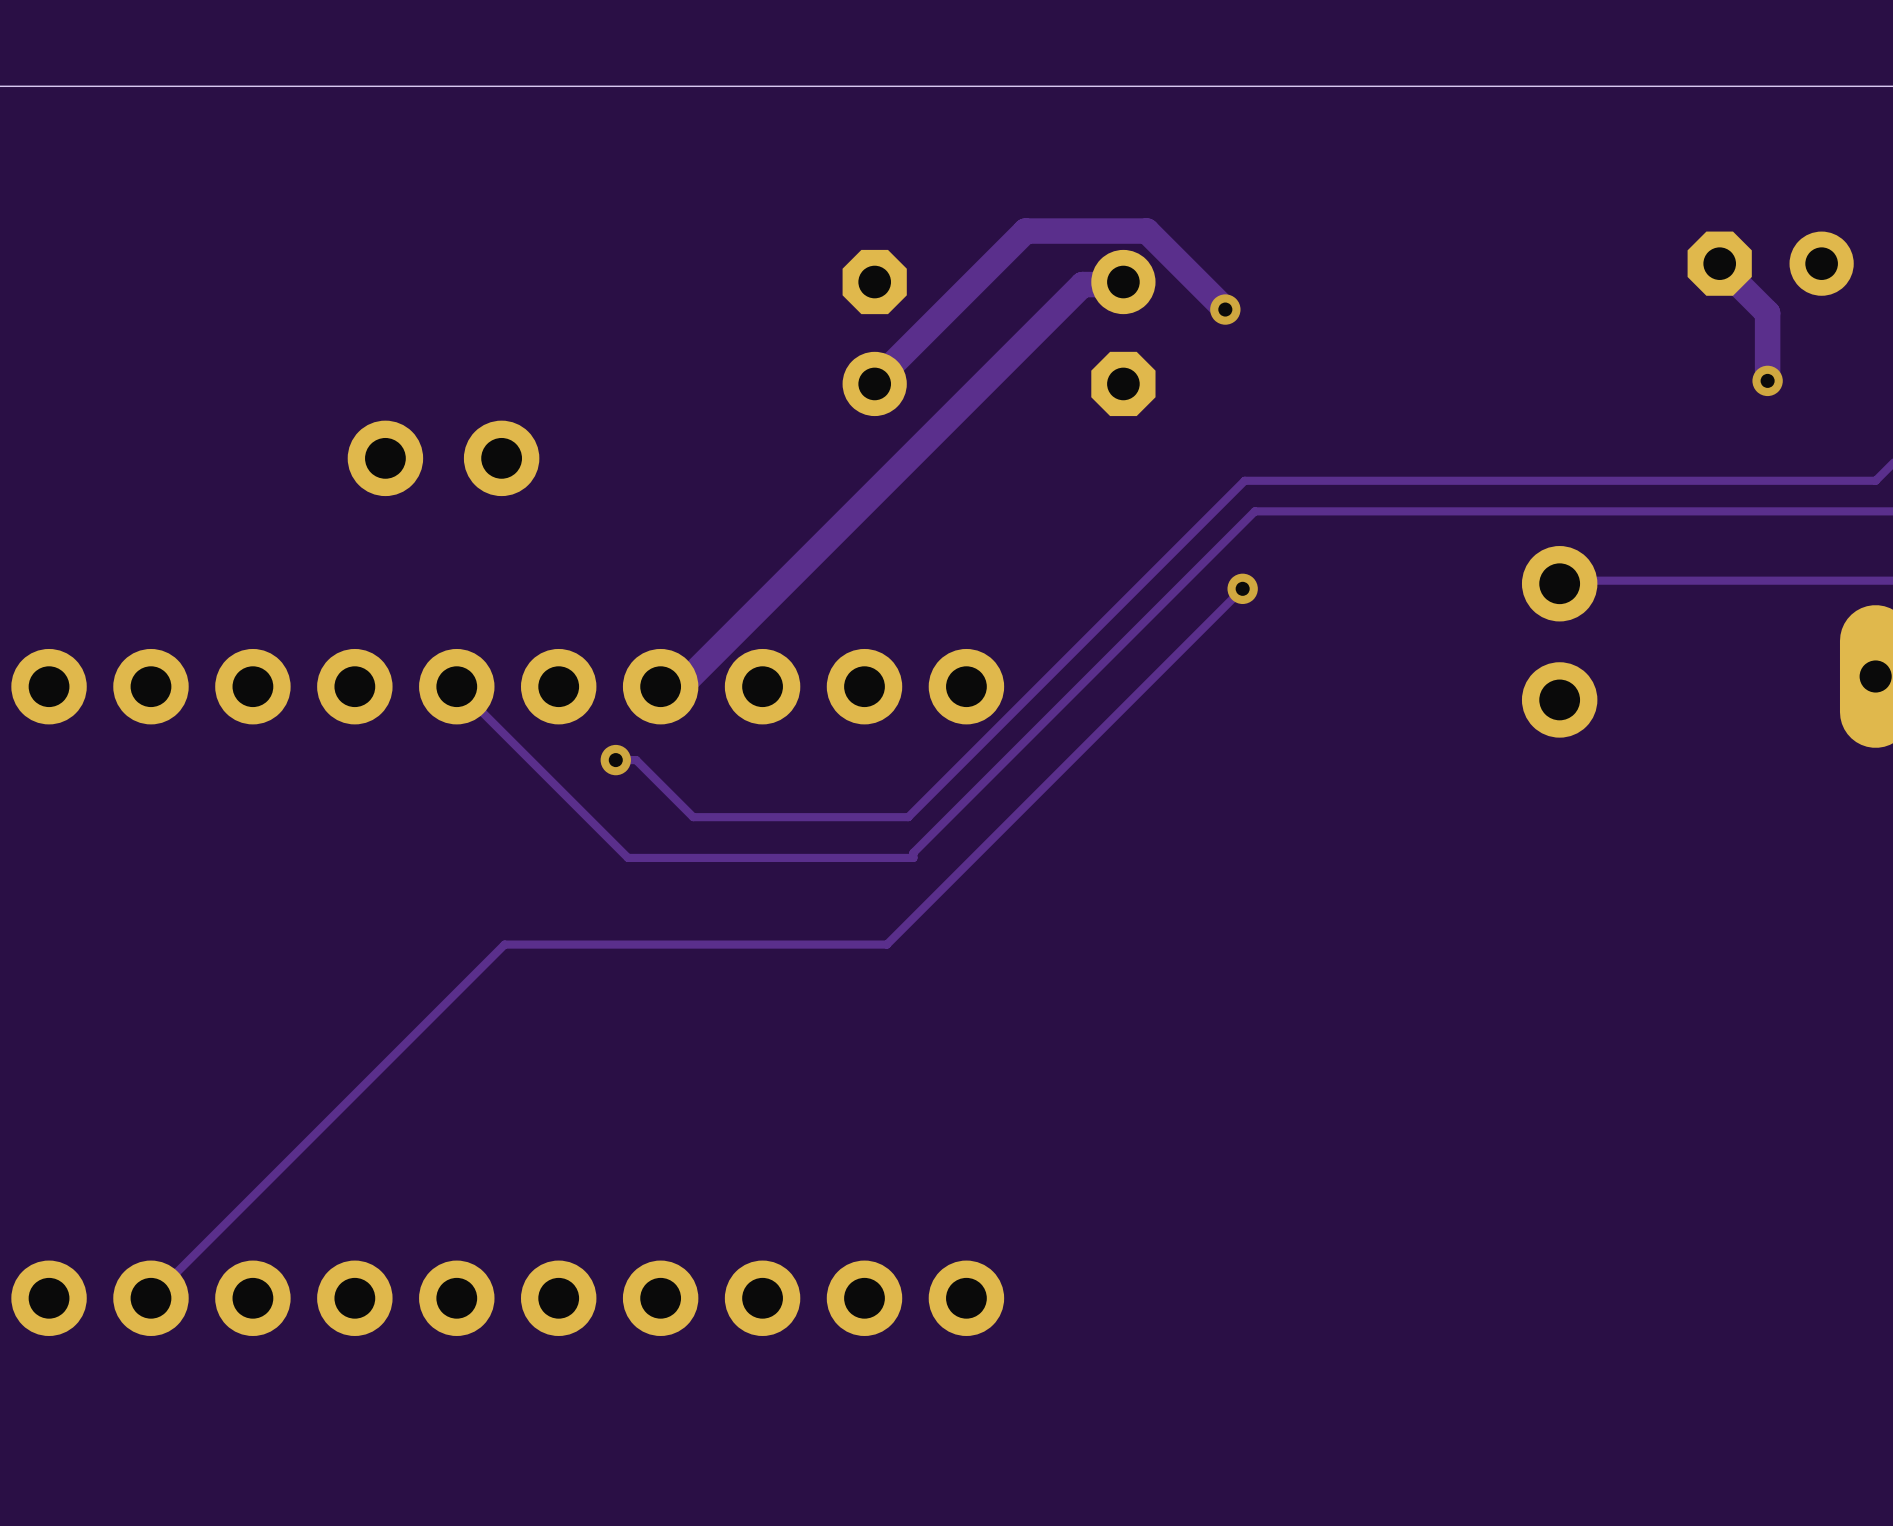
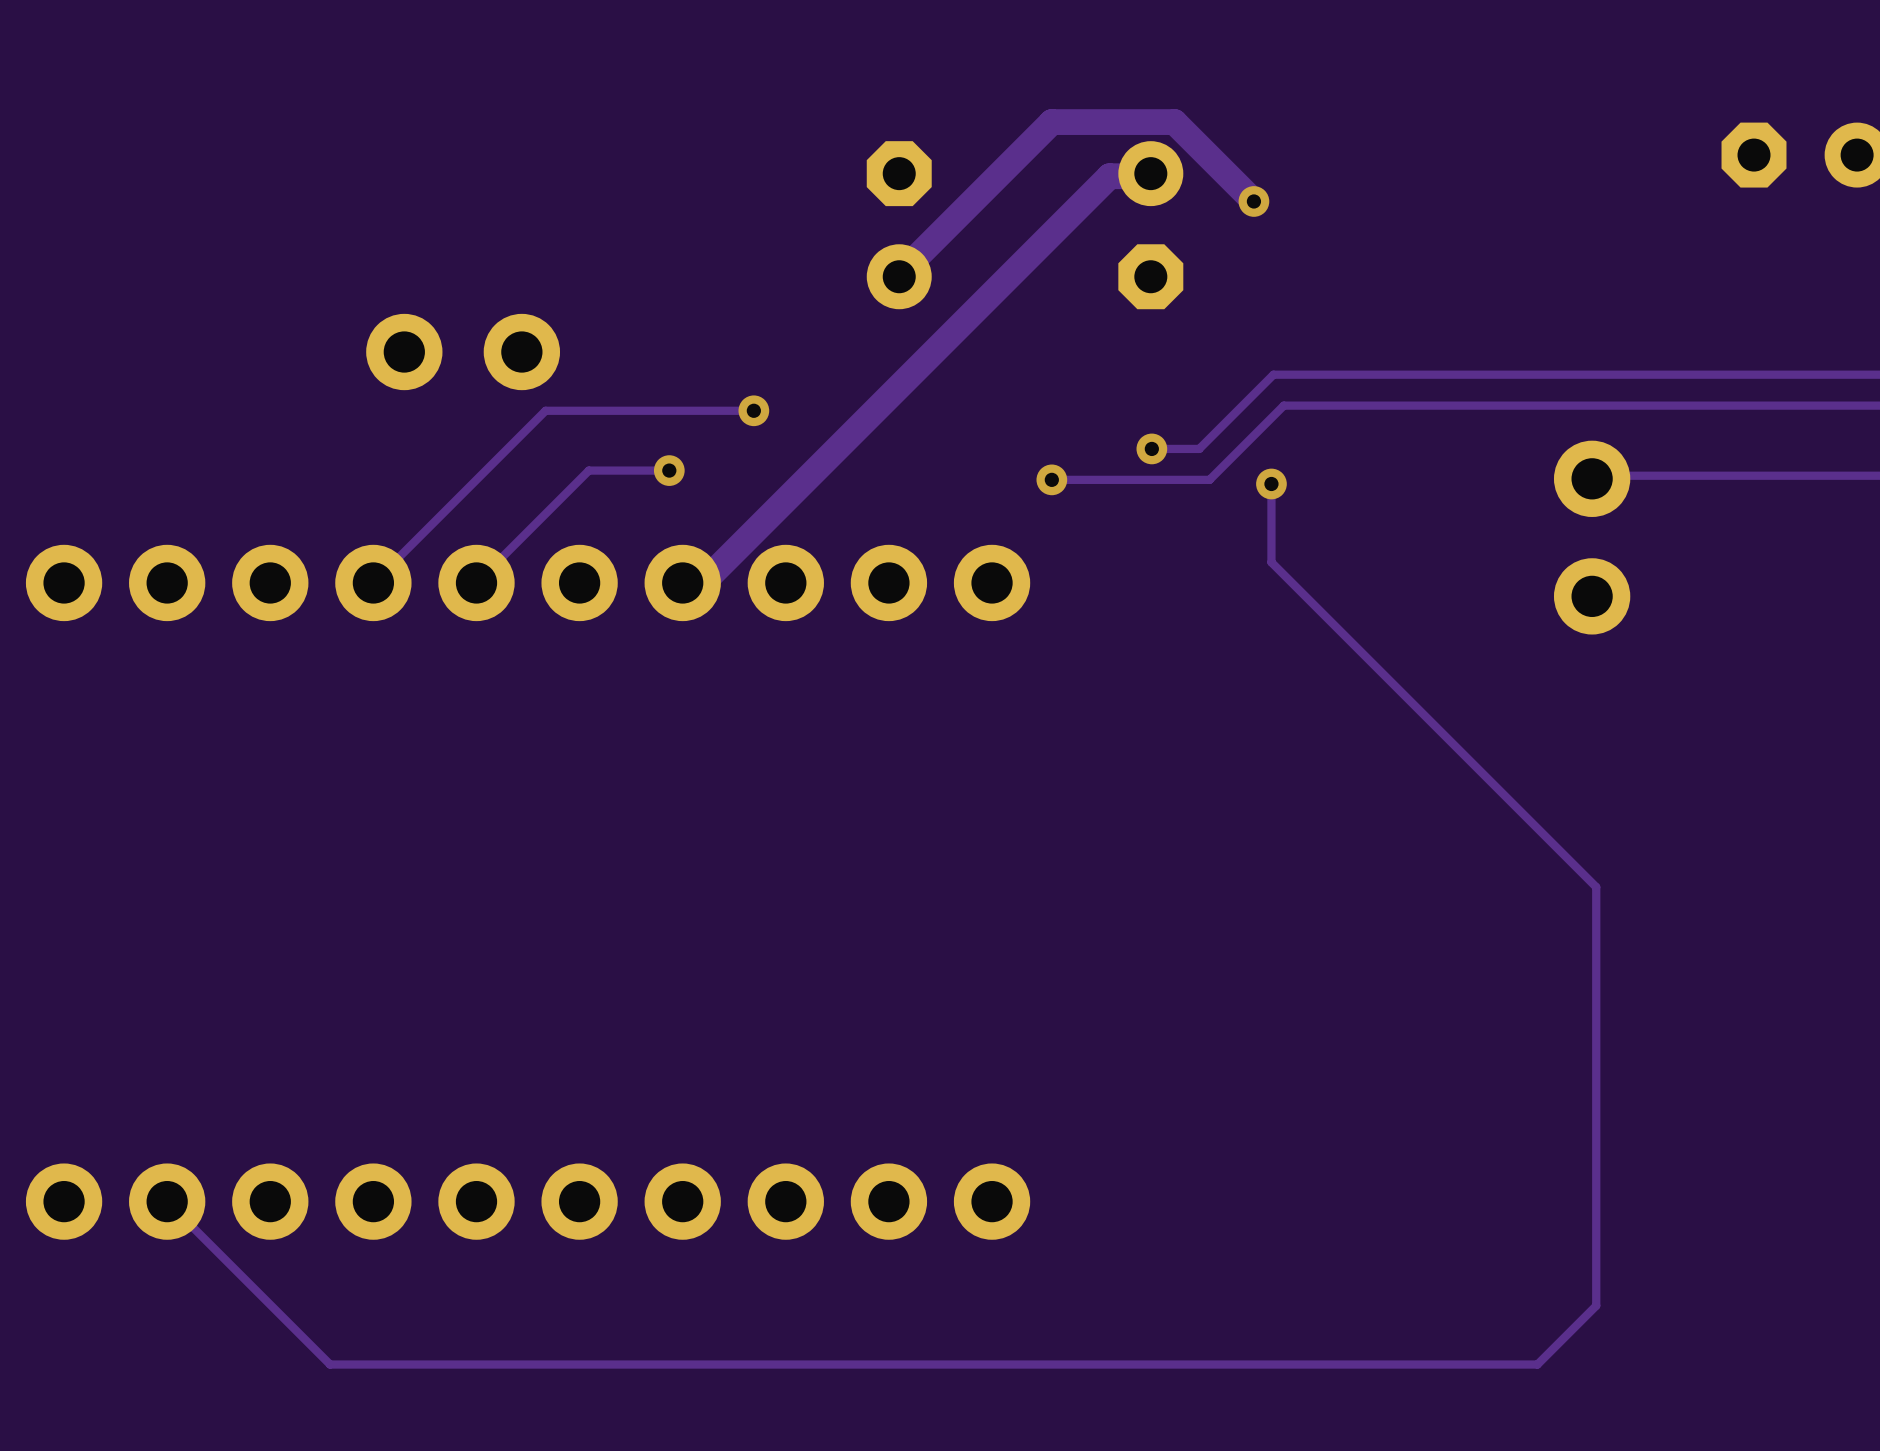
track: (1719, 263) (1767, 313) (1767, 380) -> none
via: (1767, 380) -> none
track: none -> (753, 410) (545, 410) (373, 582)
via: none -> (753, 410)
via: none -> (1151, 448)
track: (1171, 554) (908, 817) (693, 817) (636, 760) (615, 760) -> (1199, 448) (1151, 448)
via: none -> (669, 470)
via: none -> (1051, 479)
track: (1181, 584) (913, 852) (913, 857) (628, 857) (456, 686) -> (669, 470) (588, 470) (476, 582)
track: none -> (1209, 479) (1051, 479)
track: (1242, 588) (886, 944) (504, 944) (150, 1298) -> (1271, 483) (1271, 562) (1596, 887) (1596, 1305) (1537, 1364) (330, 1364) (167, 1201)
via: (615, 760) -> none

